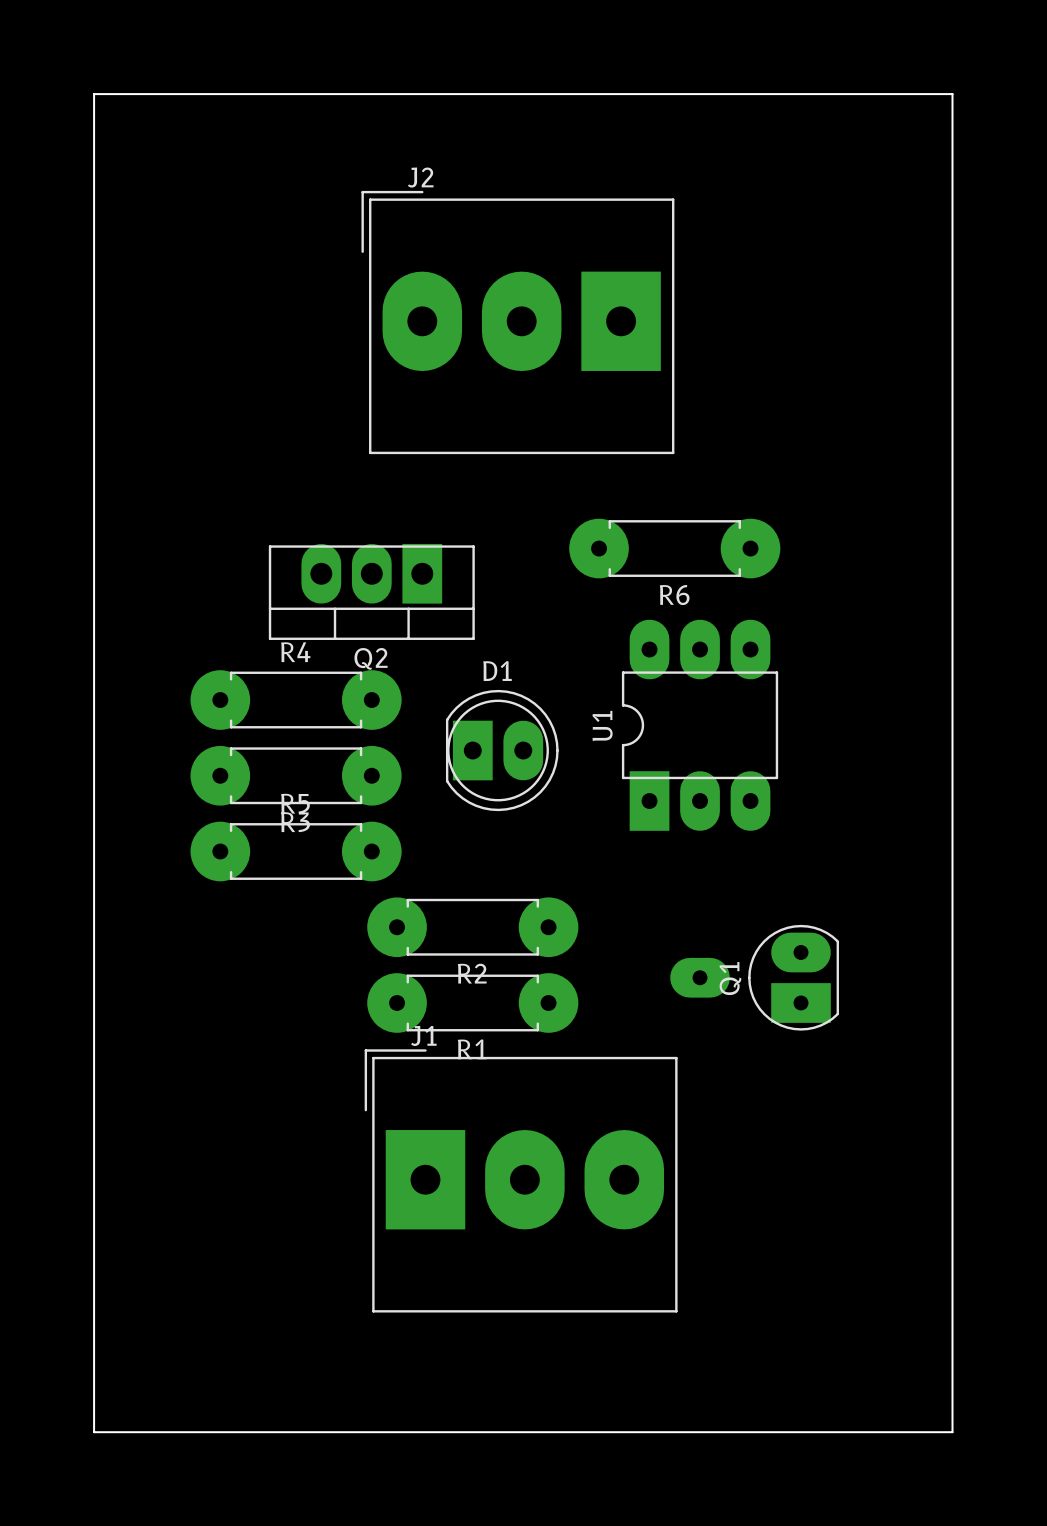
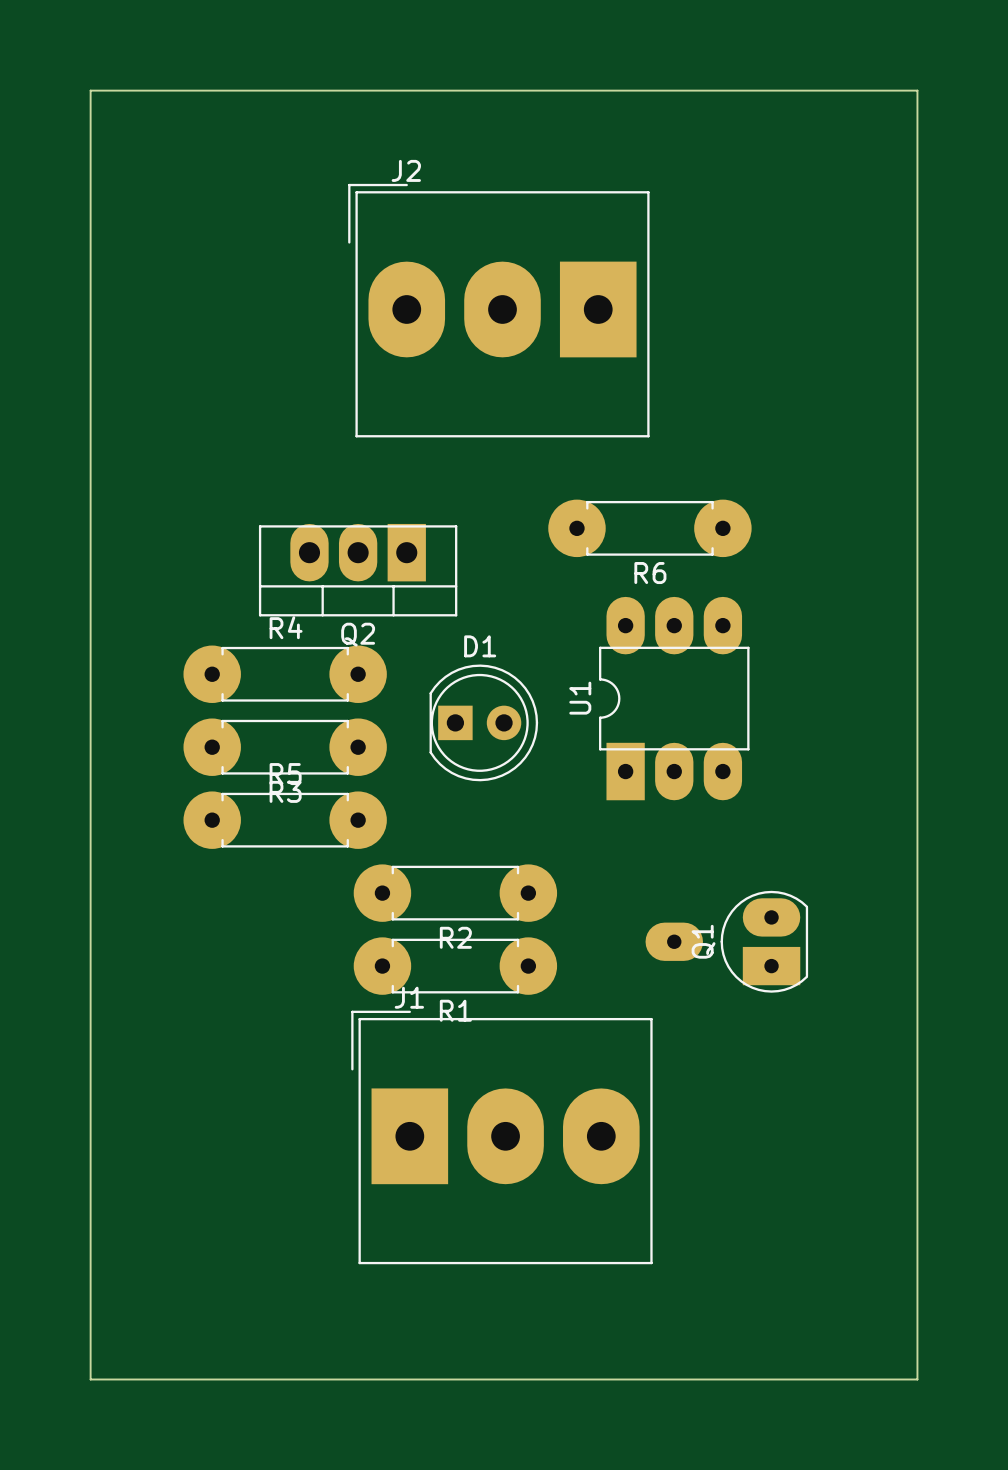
D1 footprint: [445, 689, 559, 812] -> [429, 664, 539, 782]

